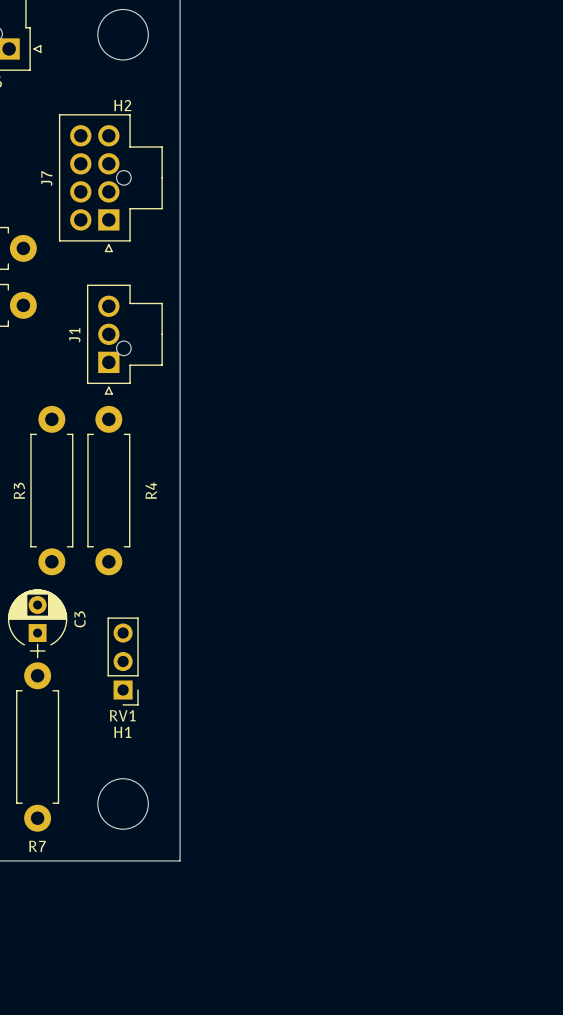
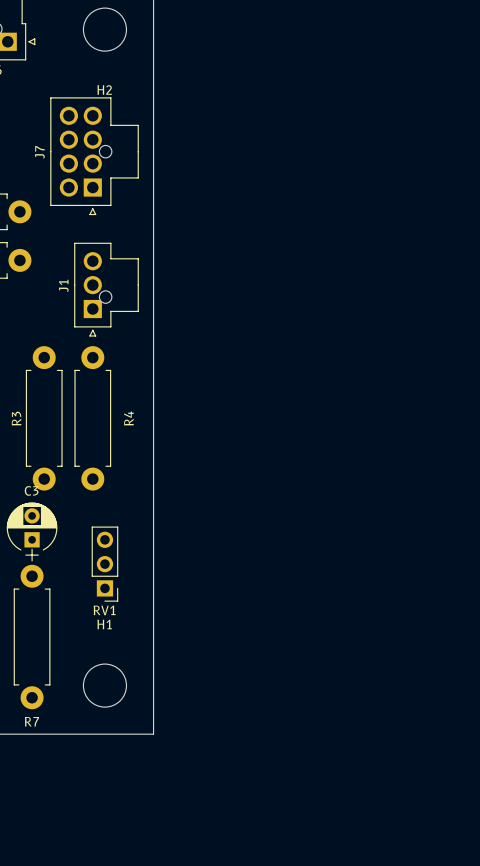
C3 name rotation: 0° (80, 619) -> 90° clockwise (31, 490)
C3 name position: C3 (80, 619) -> C3 (31, 490)

